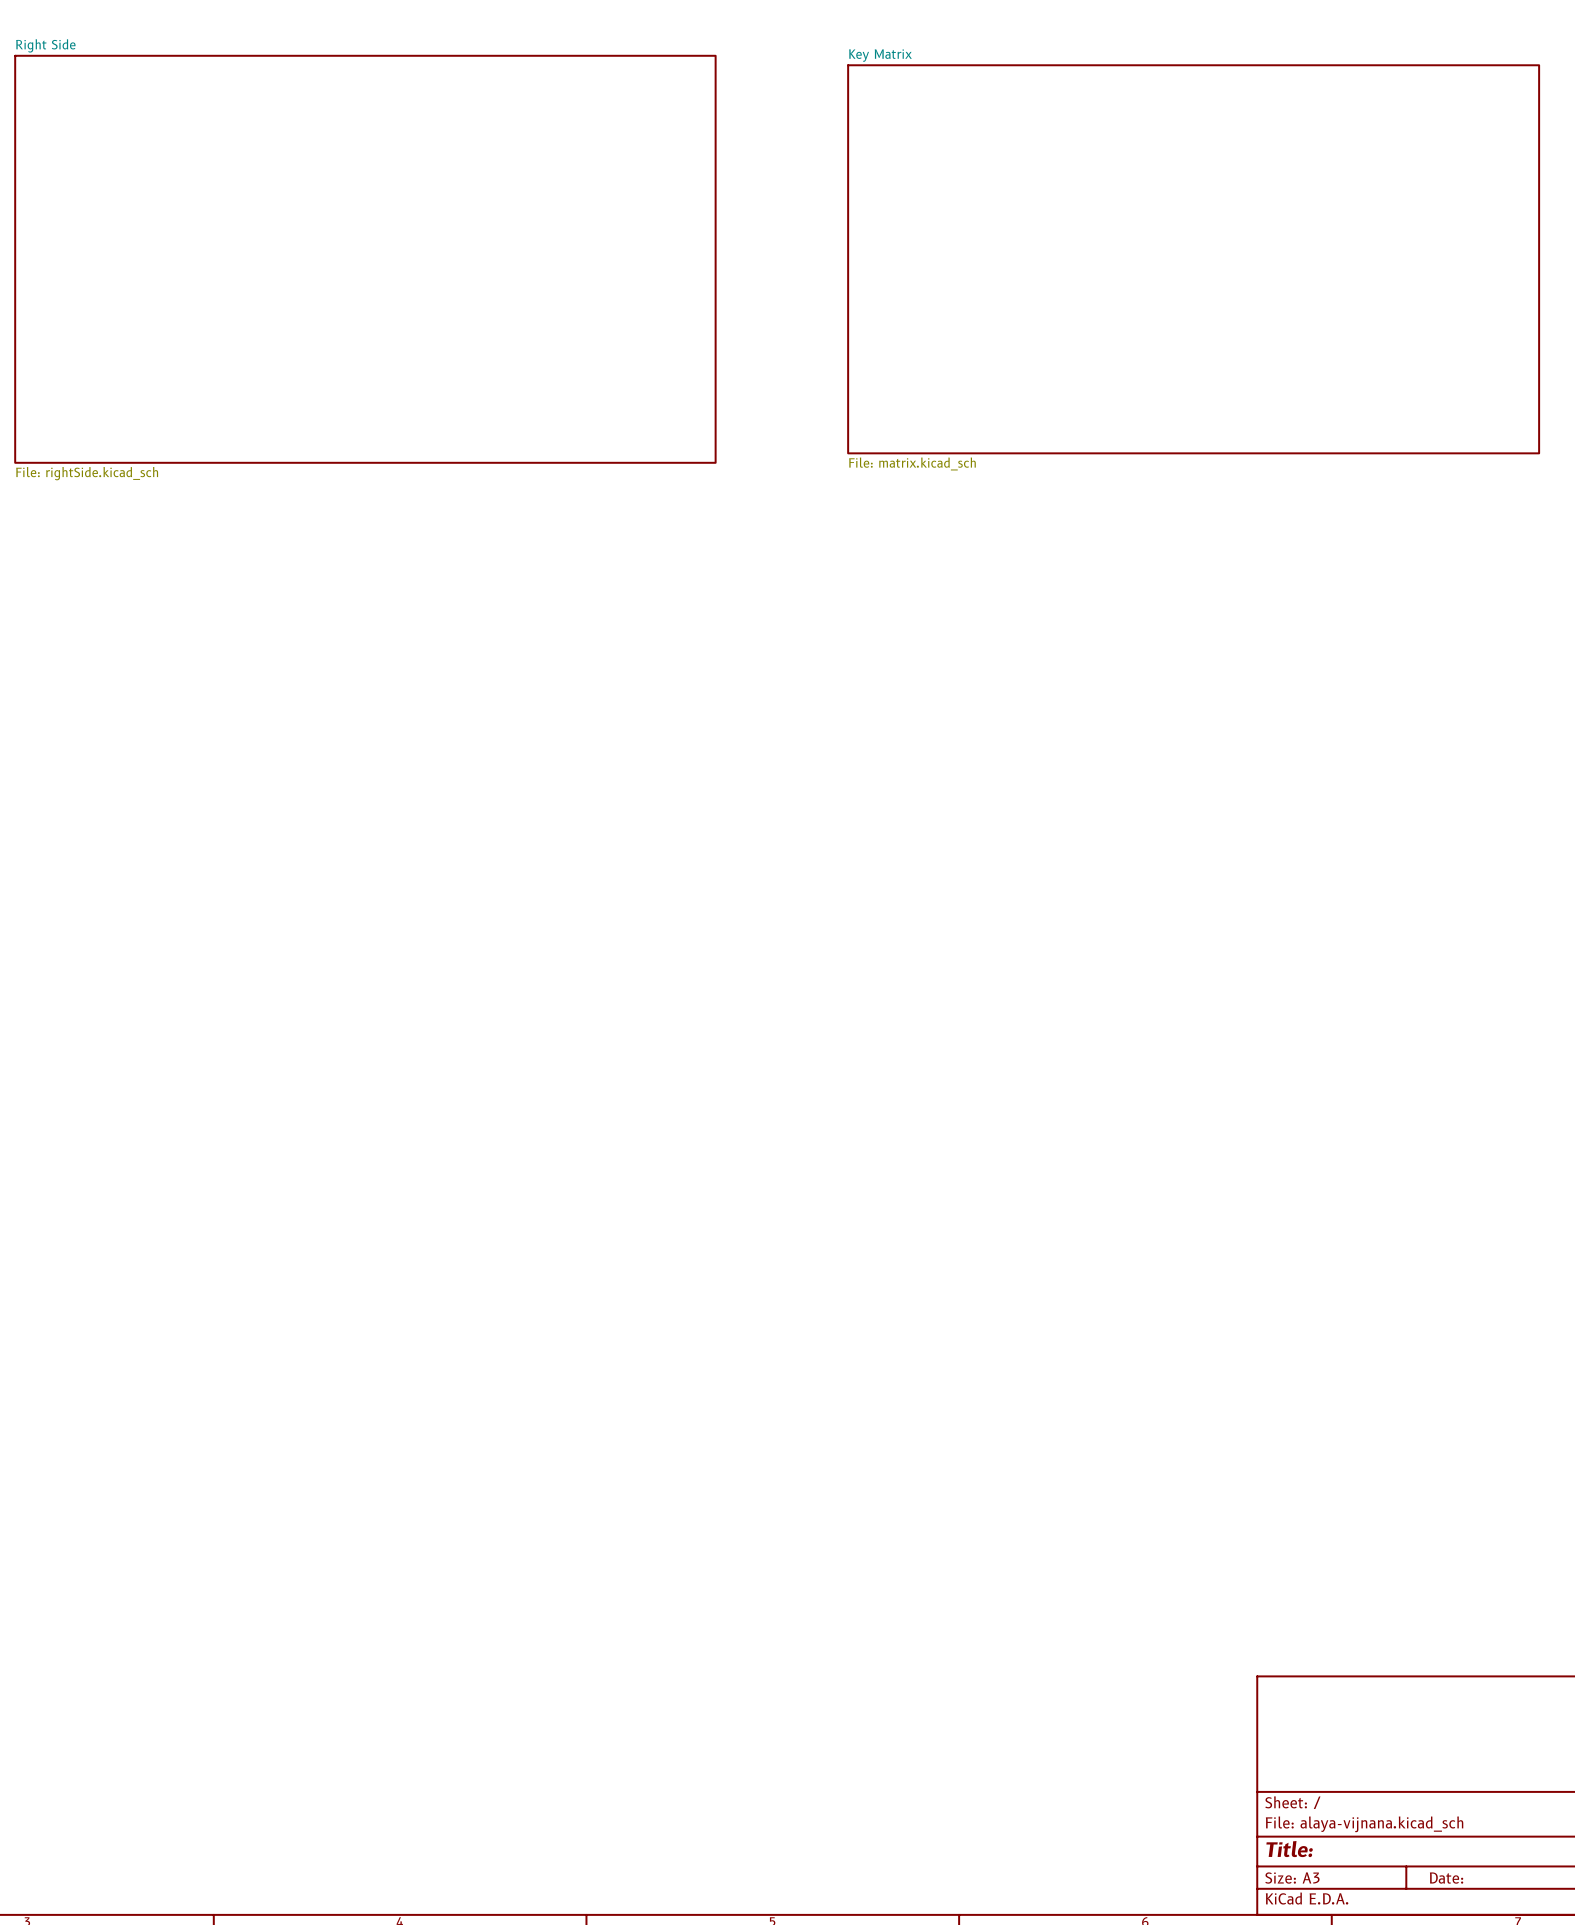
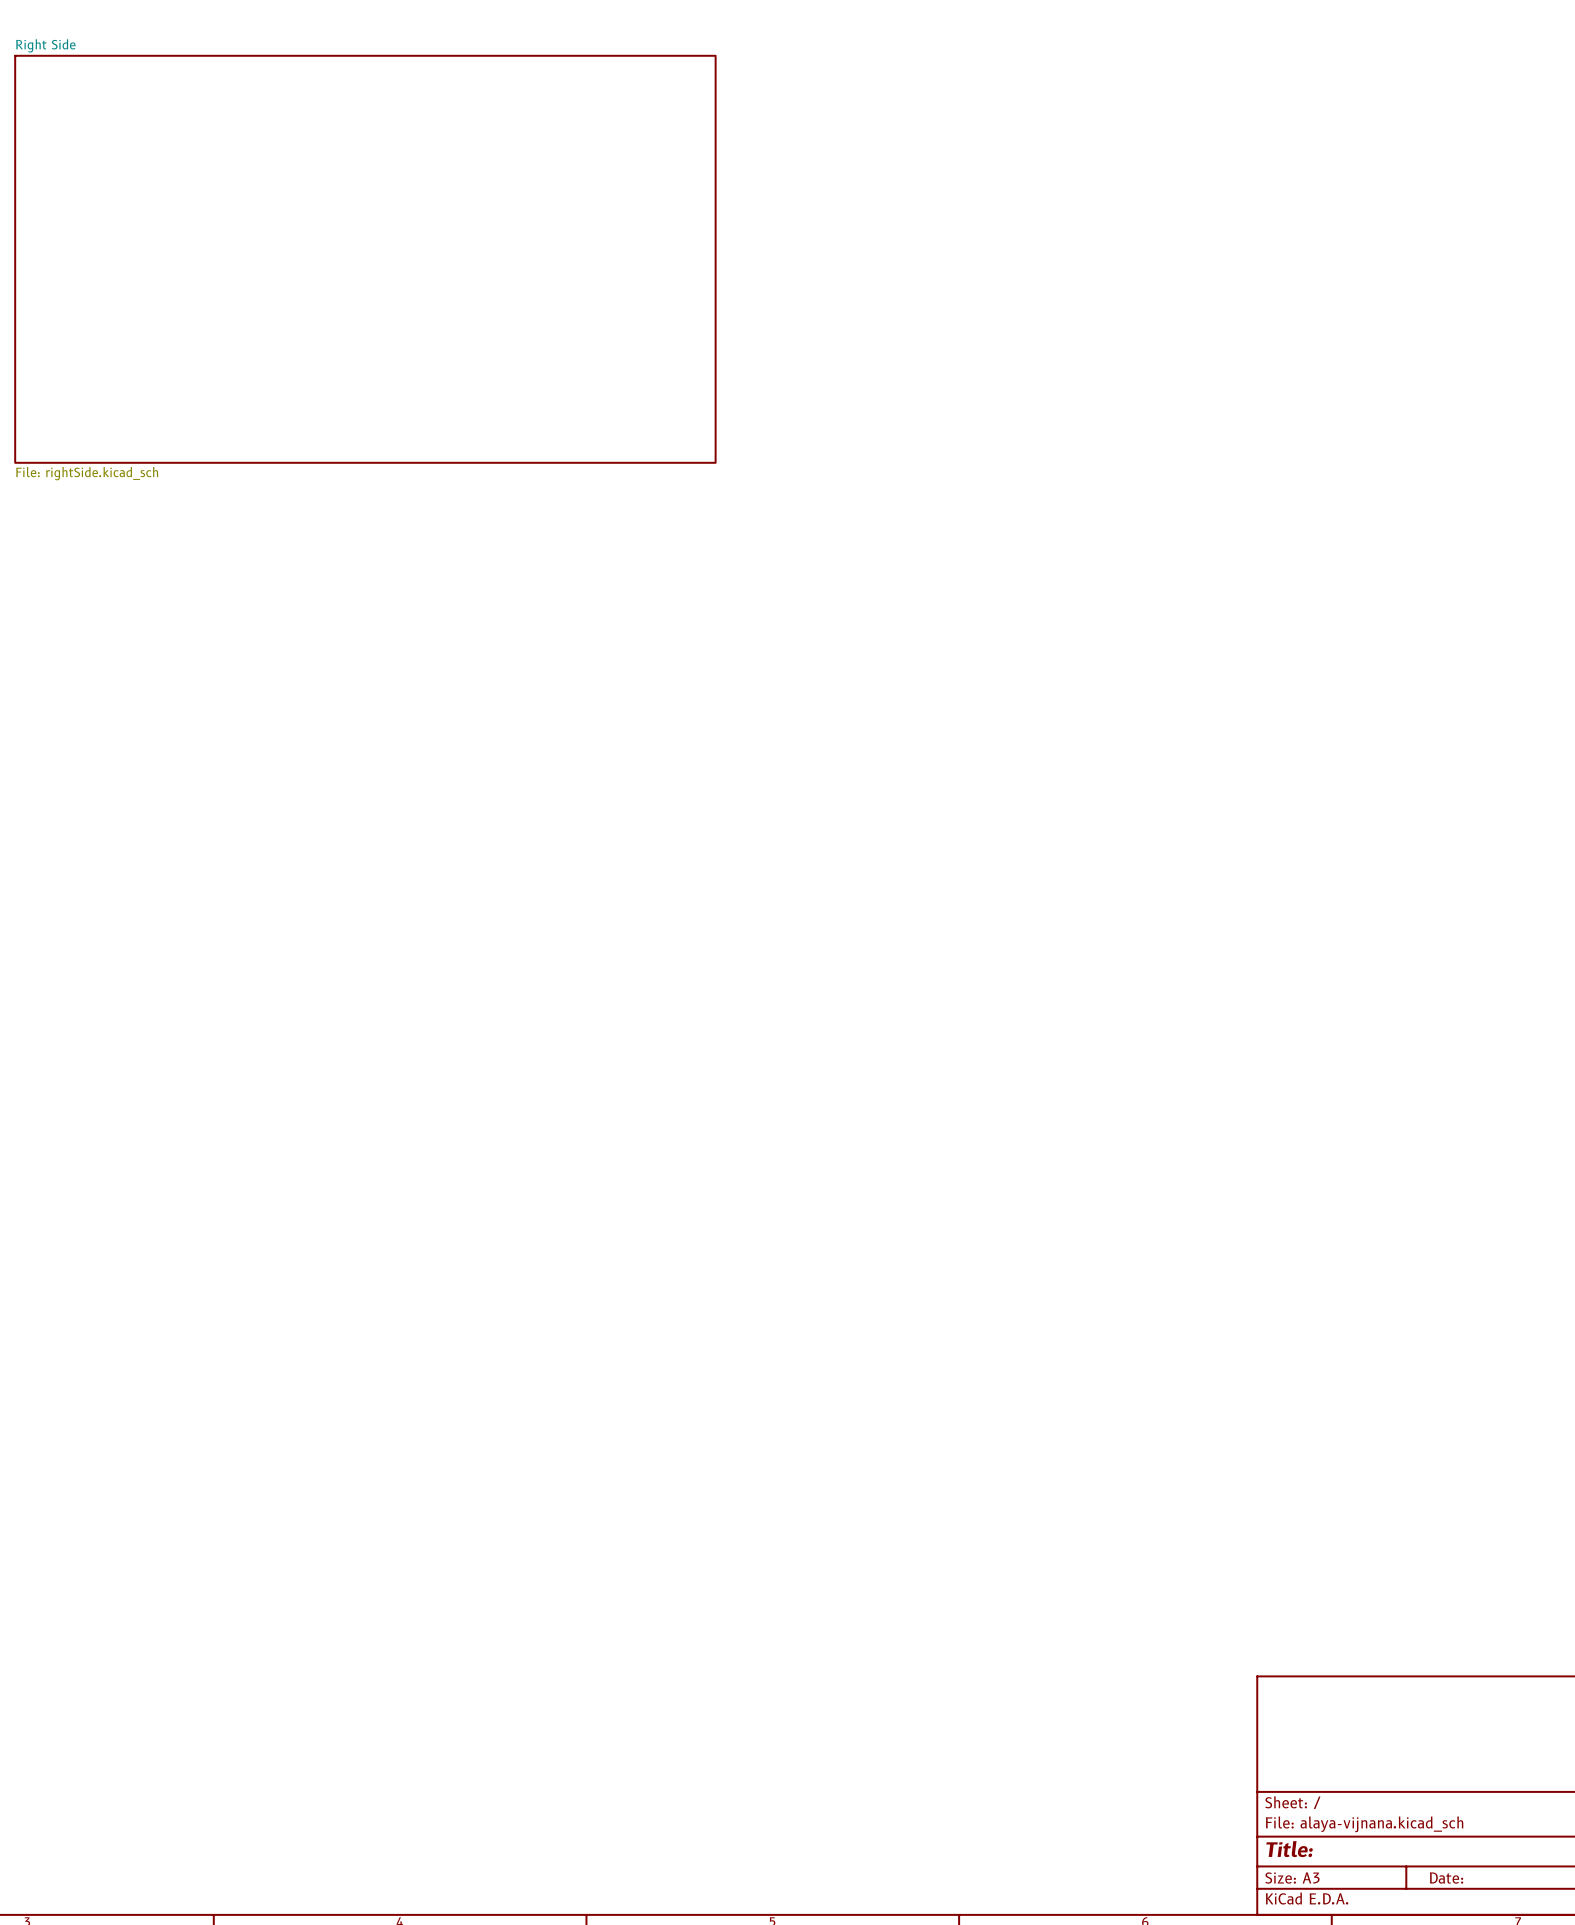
sheet Key Matrix: File: matrix.kicad_sch (1193, 259) -> none

